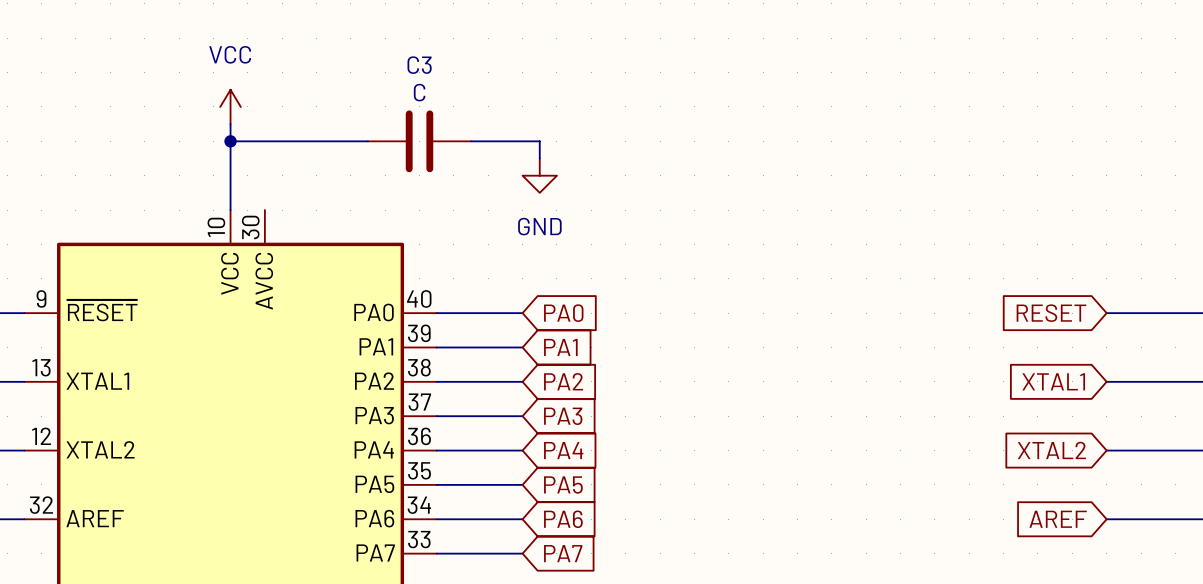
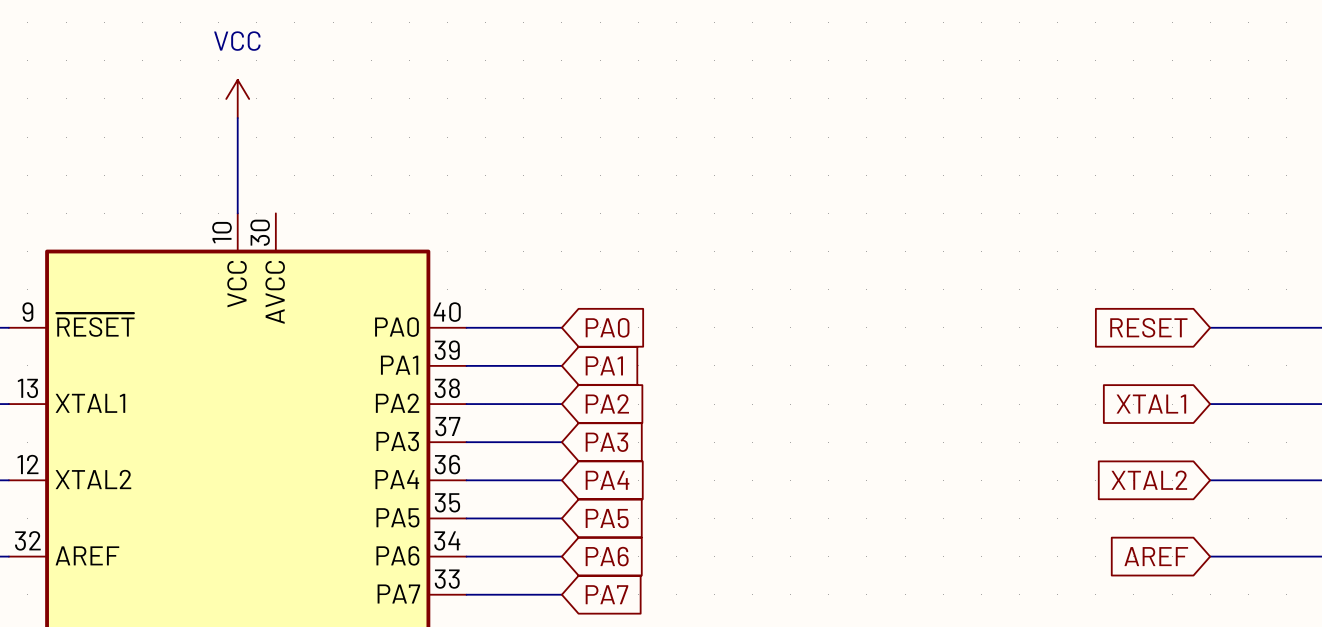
wire: (230, 141) (367, 141) -> none
junction: (230, 141) -> none
C3: C (419, 141) -> none
wire: (471, 141) (539, 141) (539, 158) -> none
power symbol: GND (539, 175) -> none

